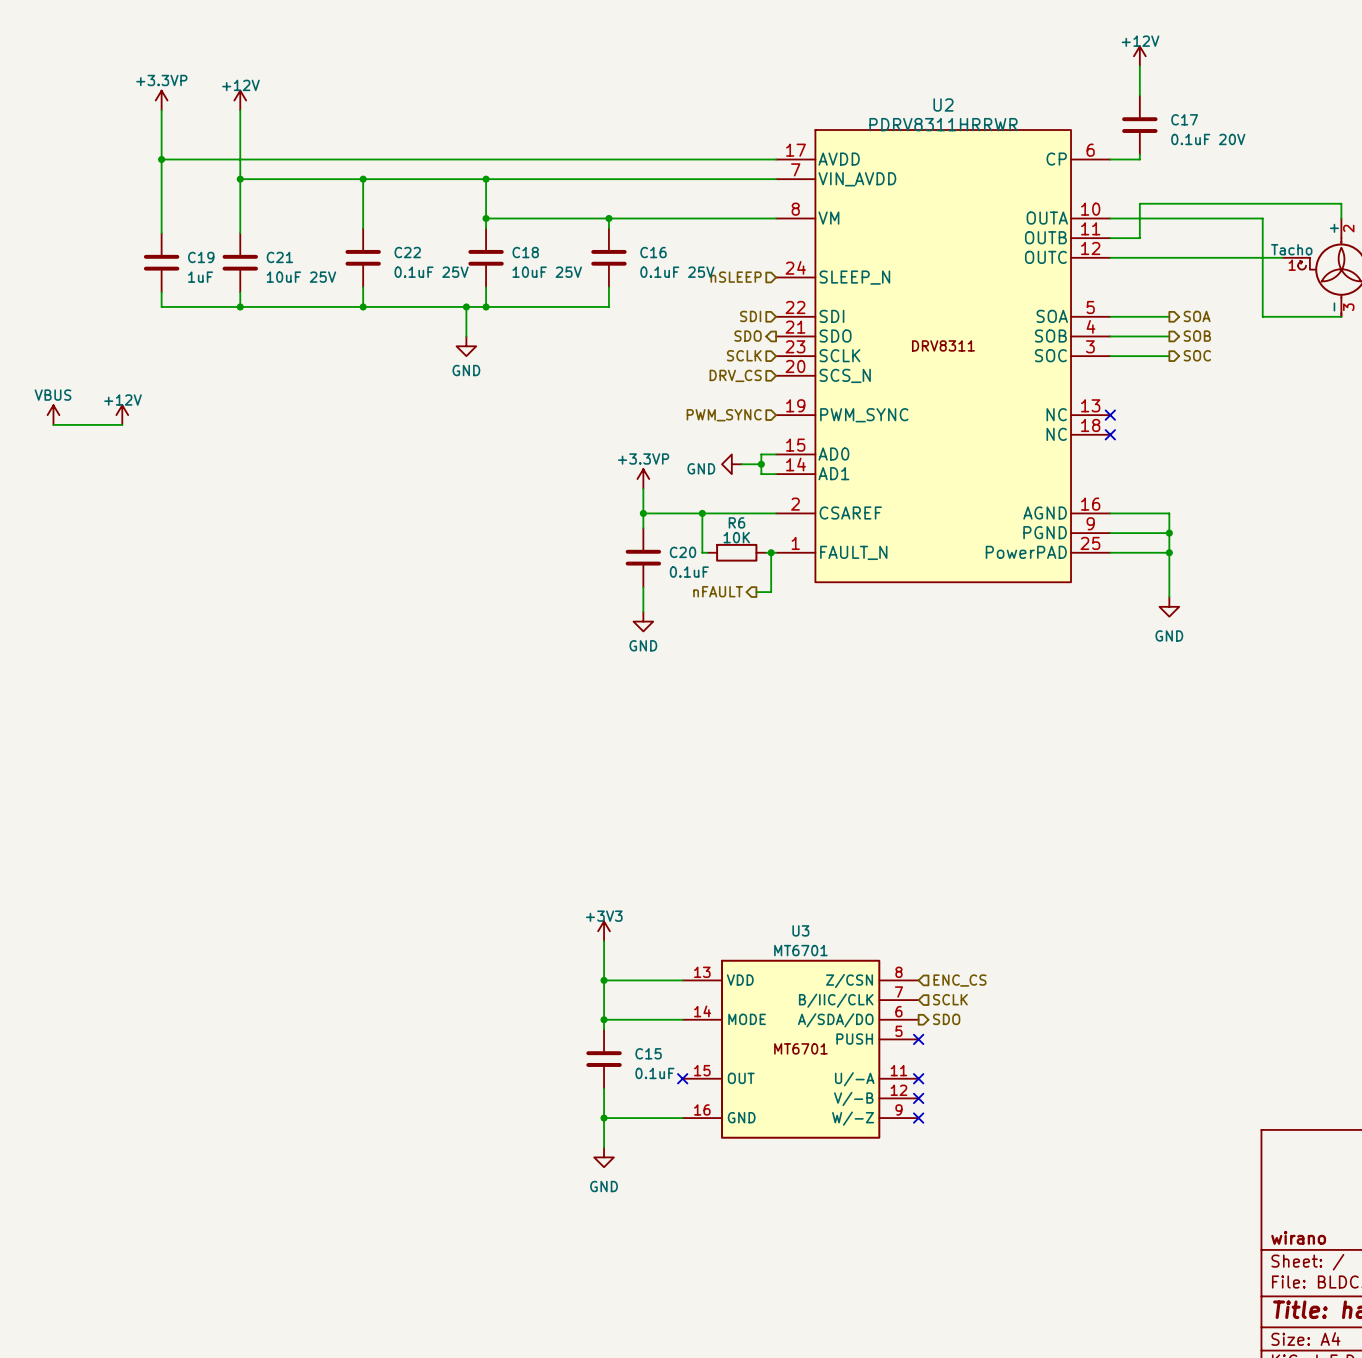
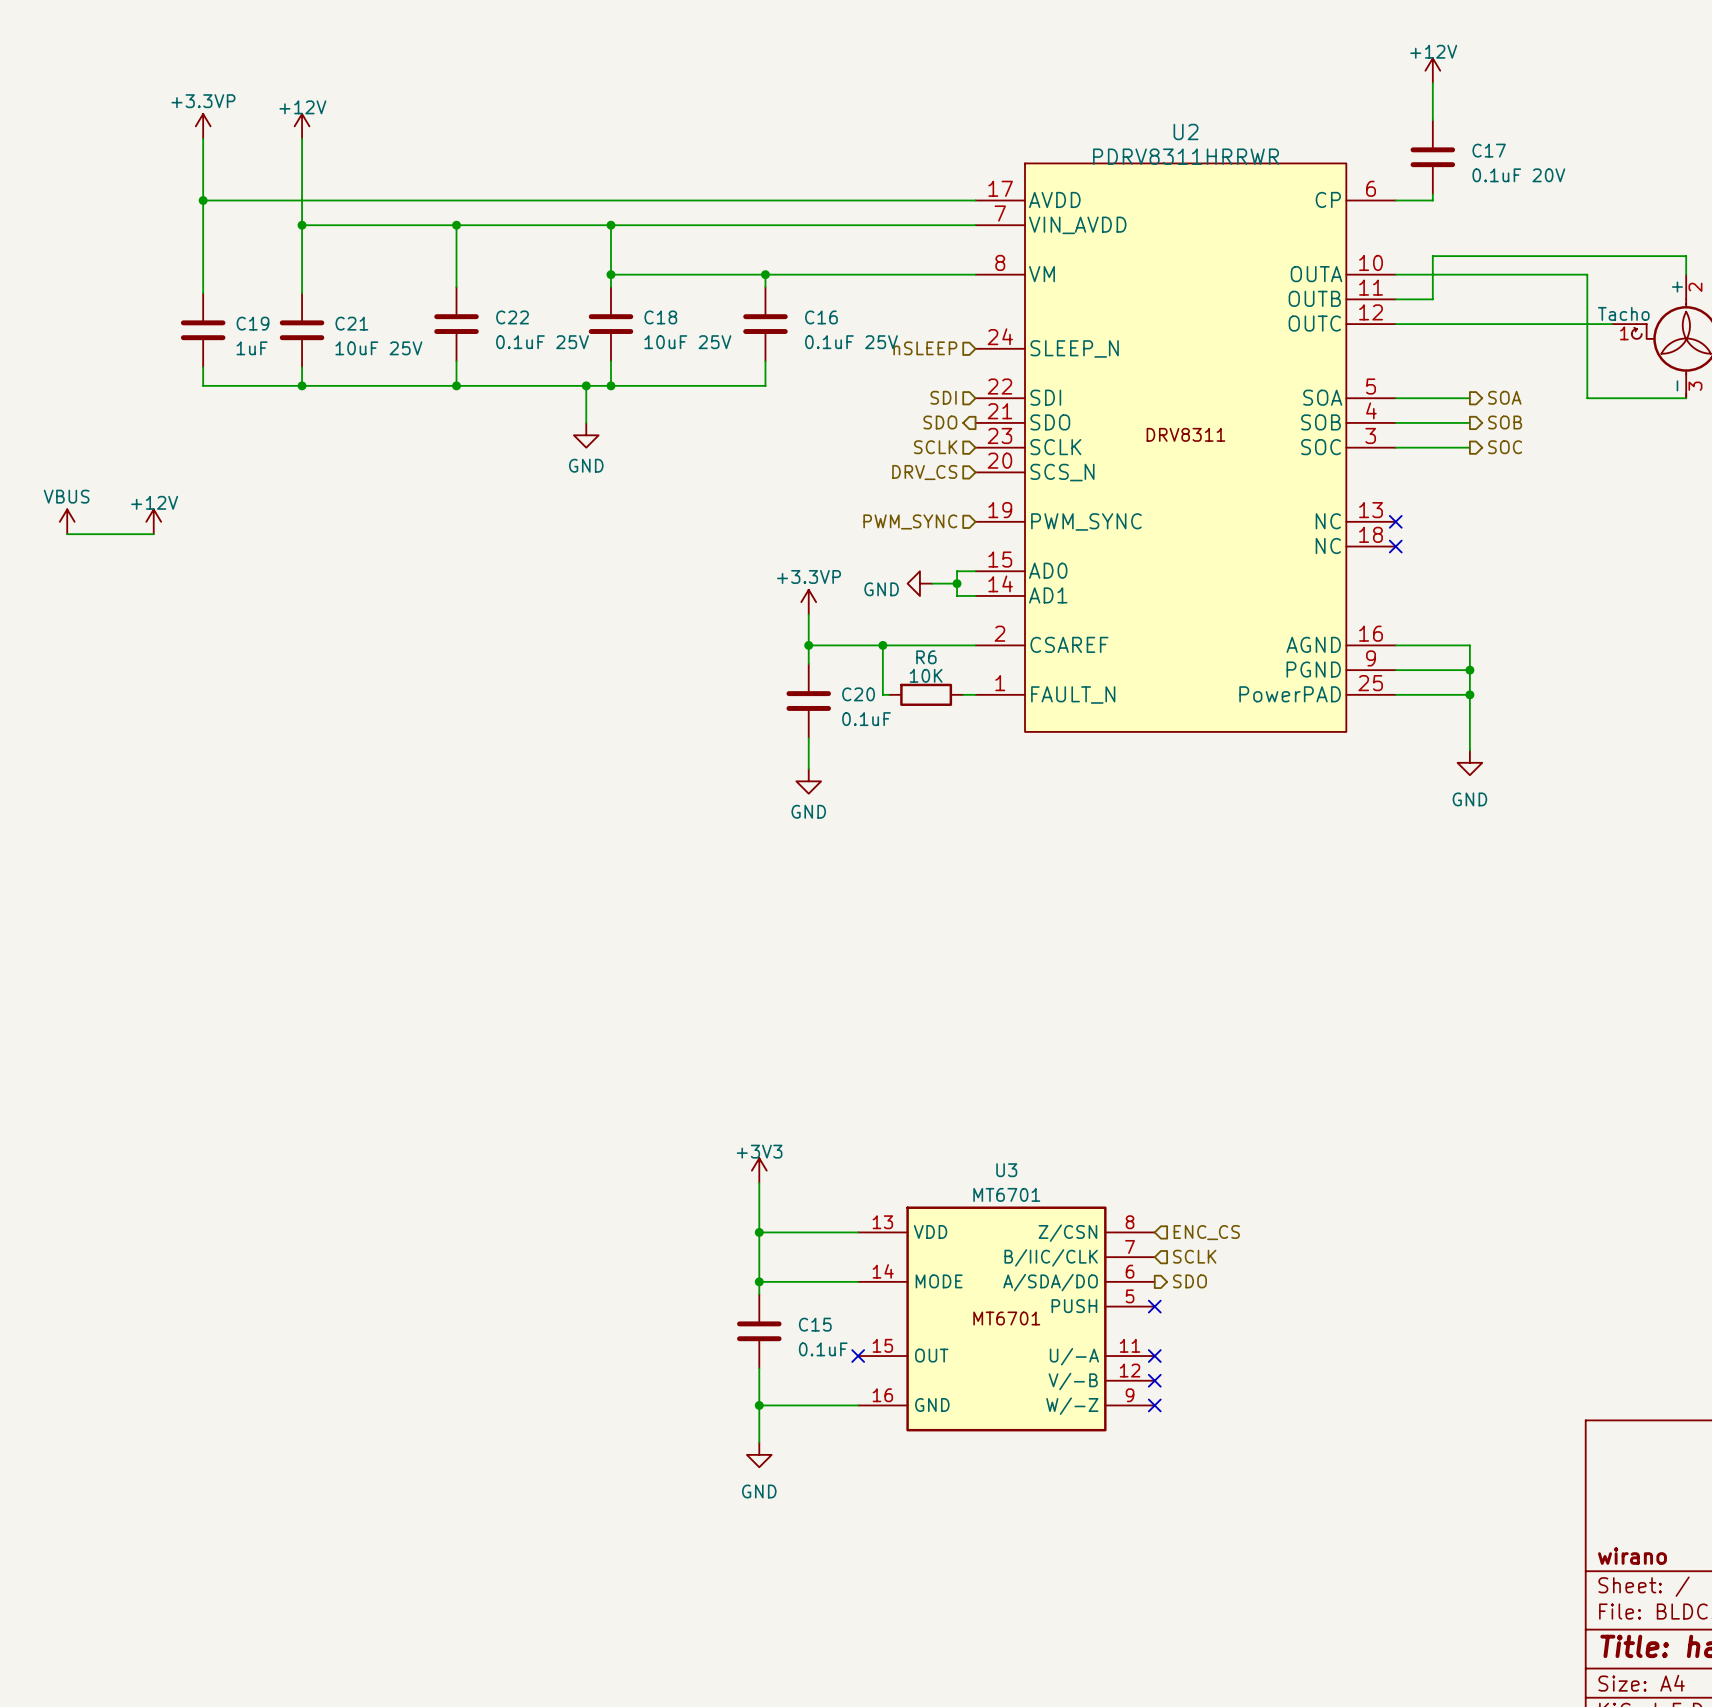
wire: (771, 552) (771, 592) (756, 592) -> none
junction: (771, 552) -> none
hierarchical label: nFAULT (718, 591) -> none

